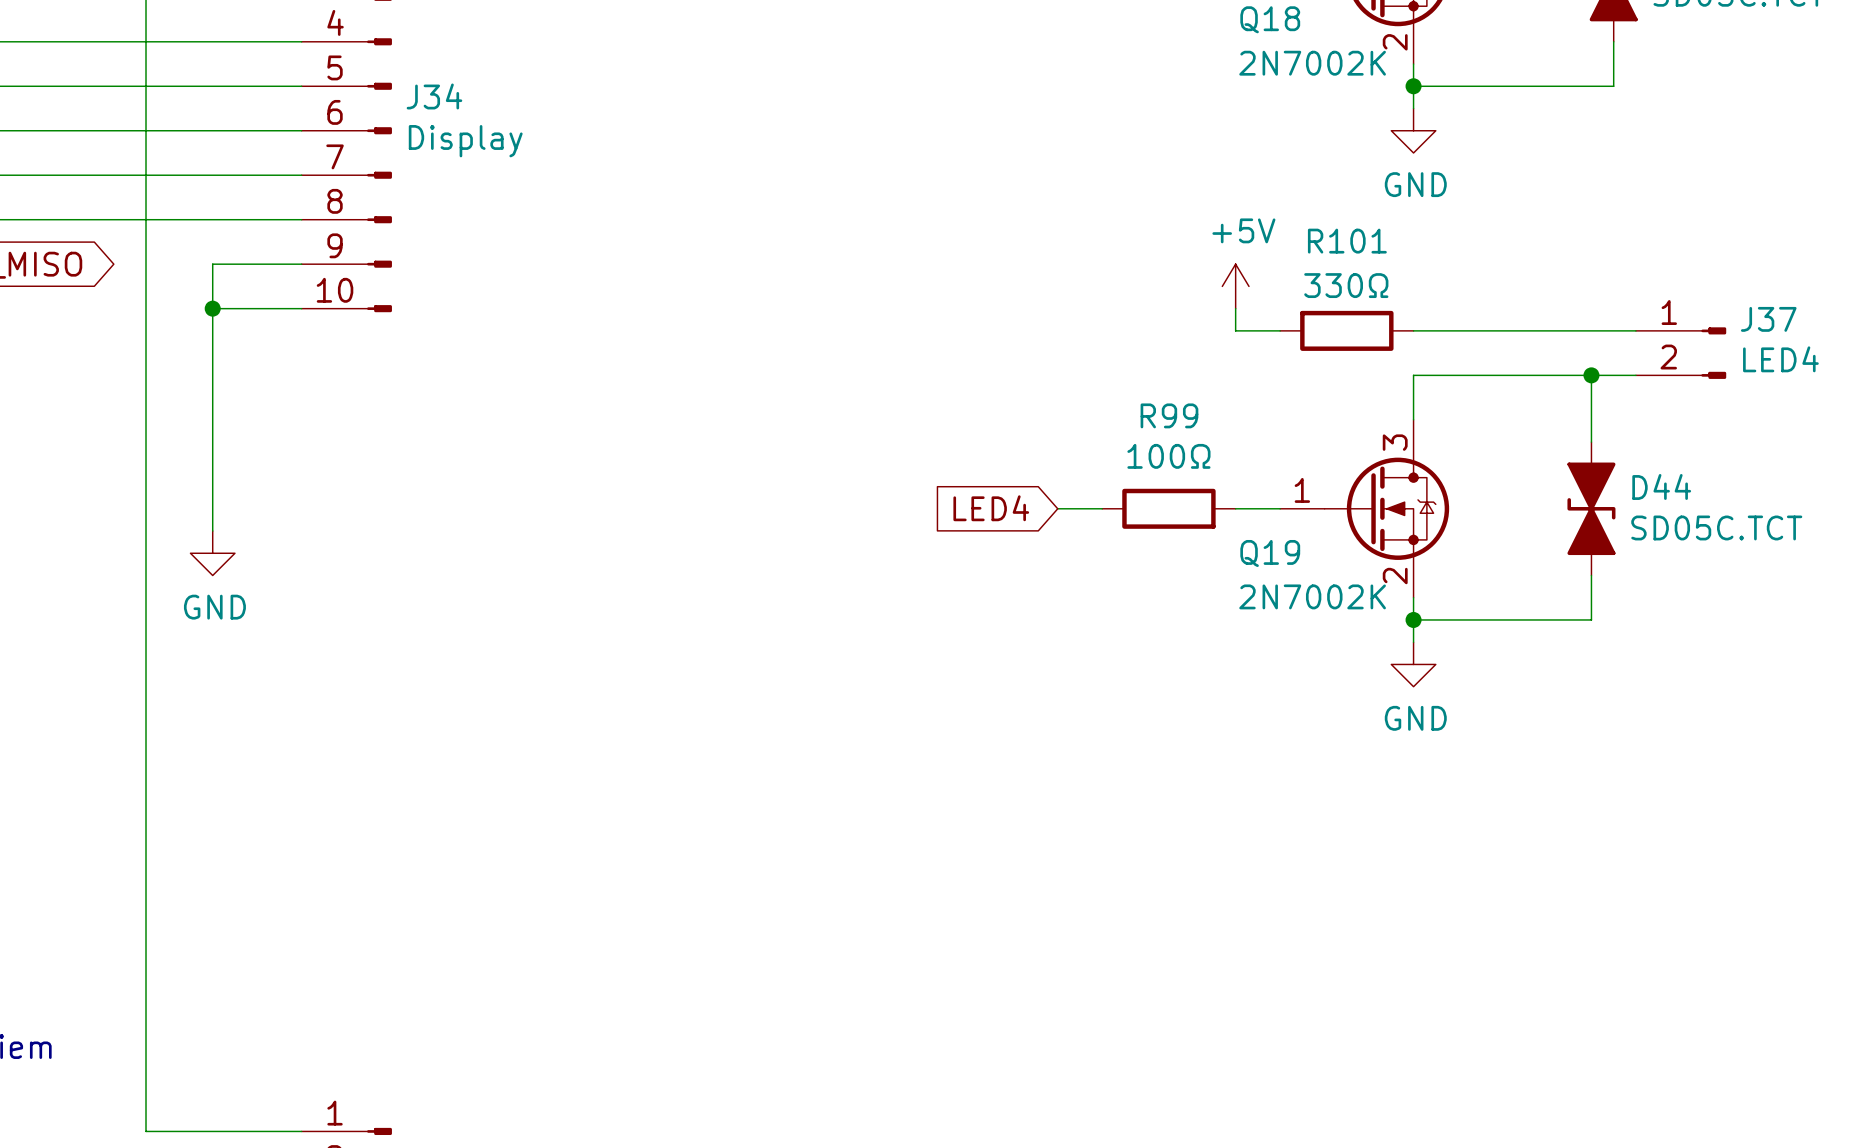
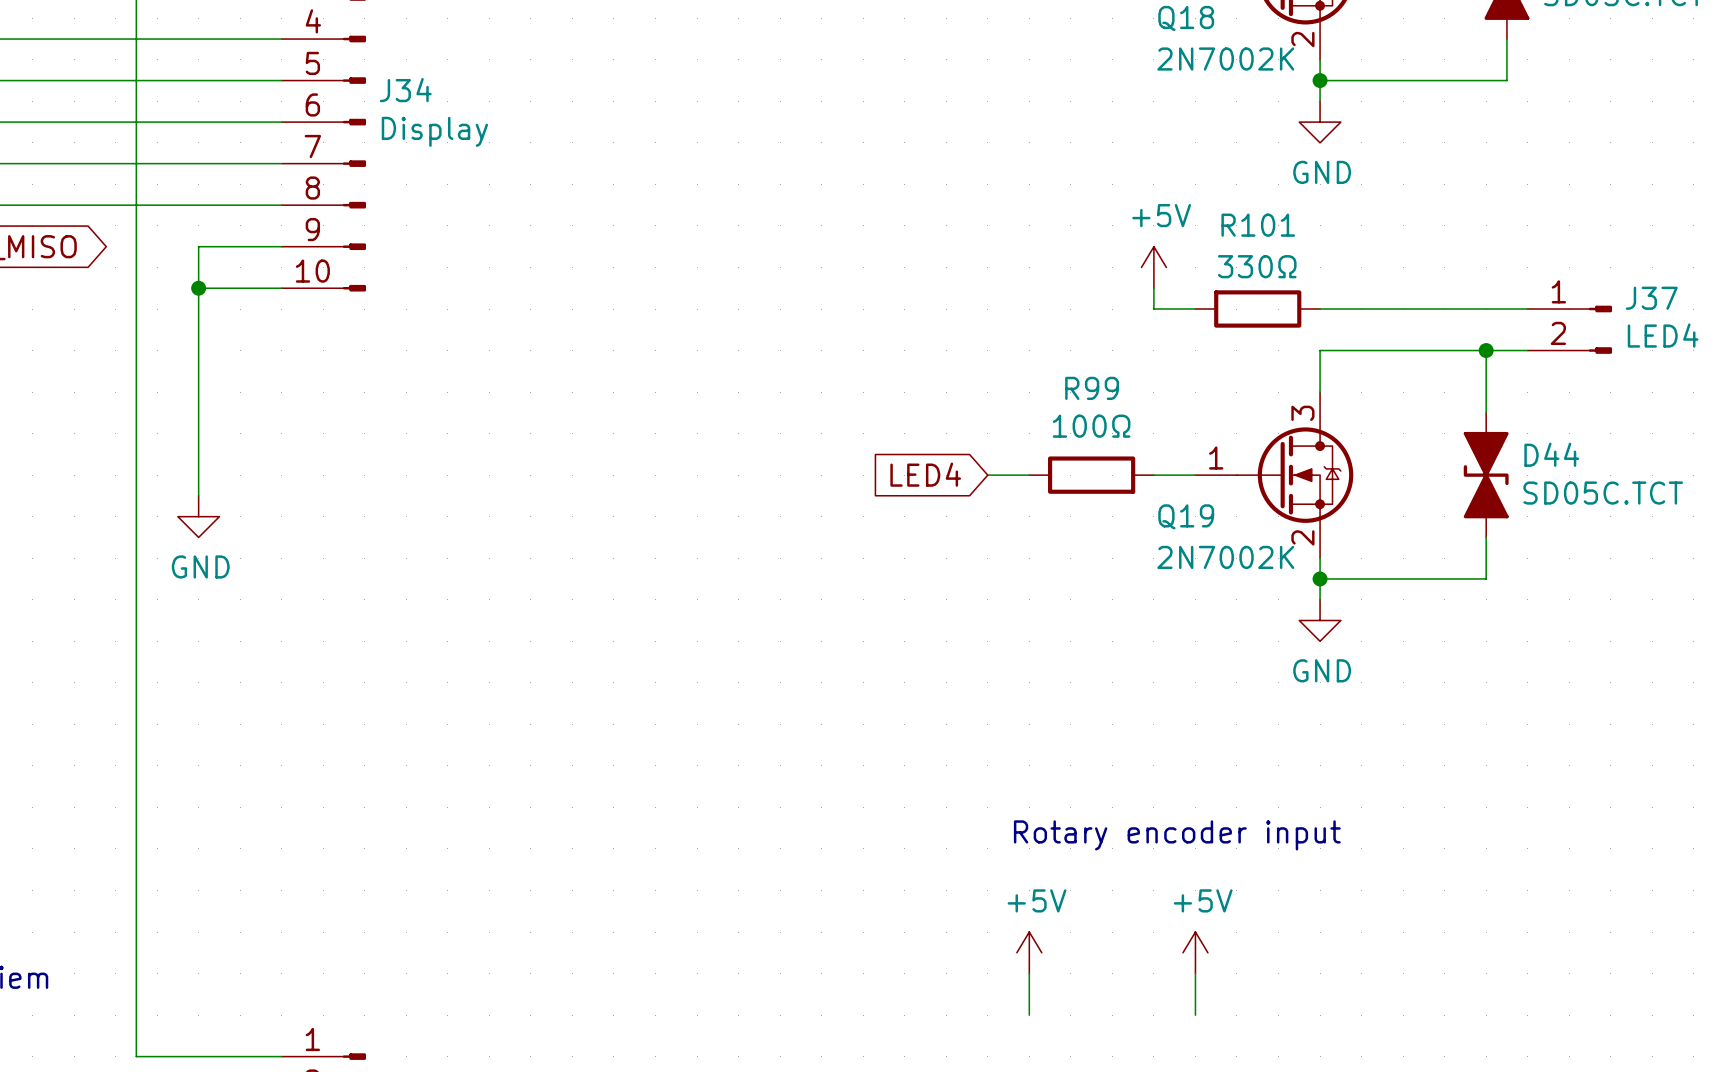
text: none -> Rotary encoder input (1177, 835)
power symbol: none -> +5V (1029, 952)
power symbol: none -> +5V (1195, 952)
wire: none -> (1029, 973) (1029, 1015)
wire: none -> (1195, 973) (1195, 1015)

